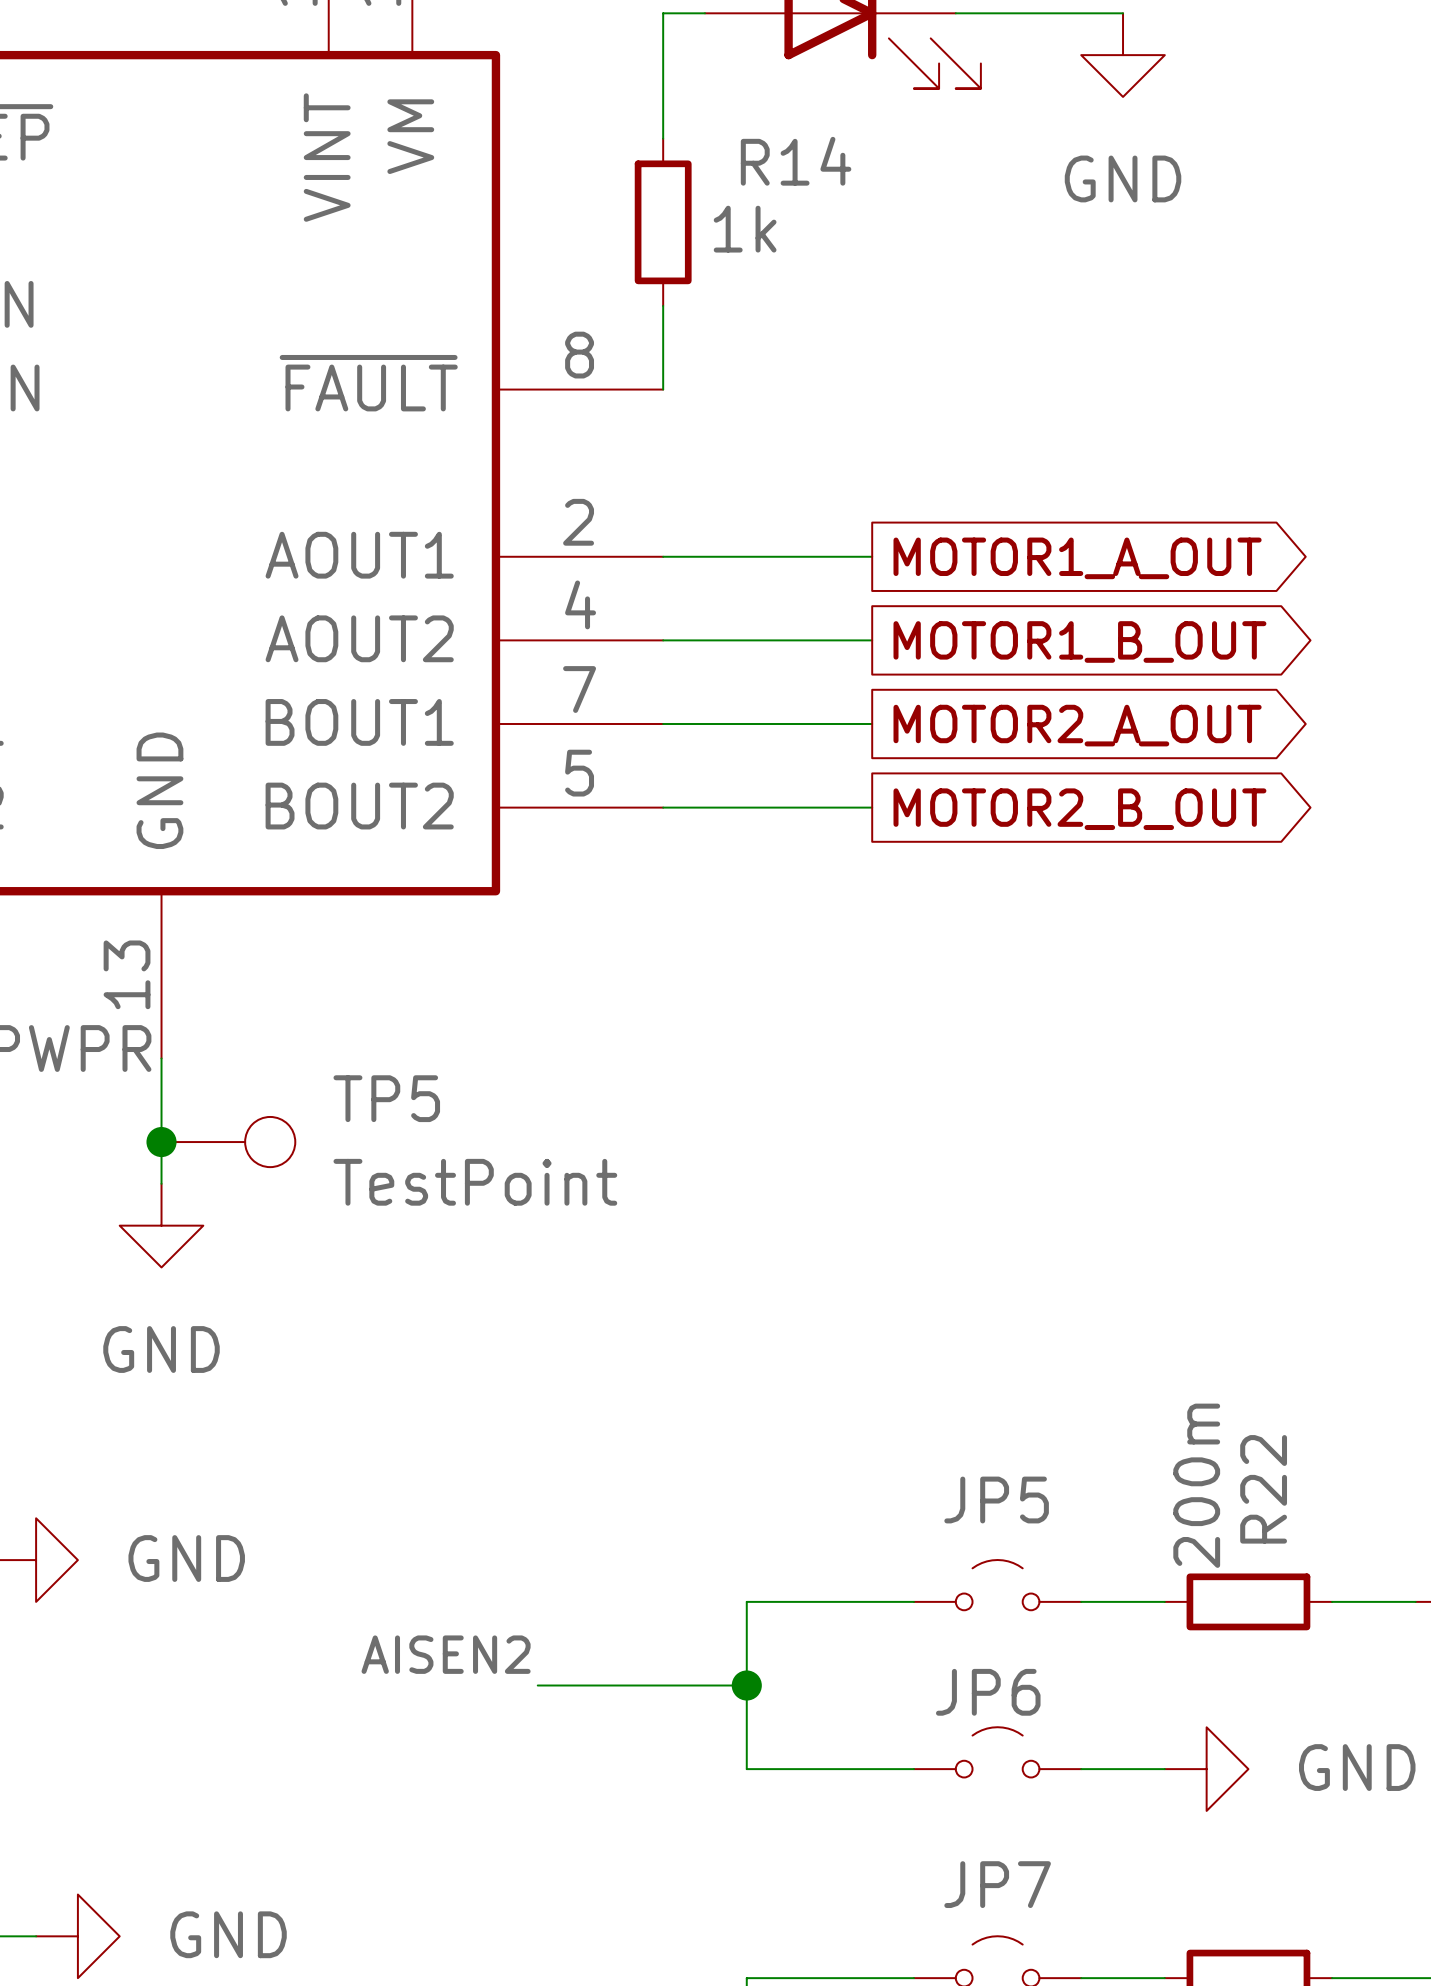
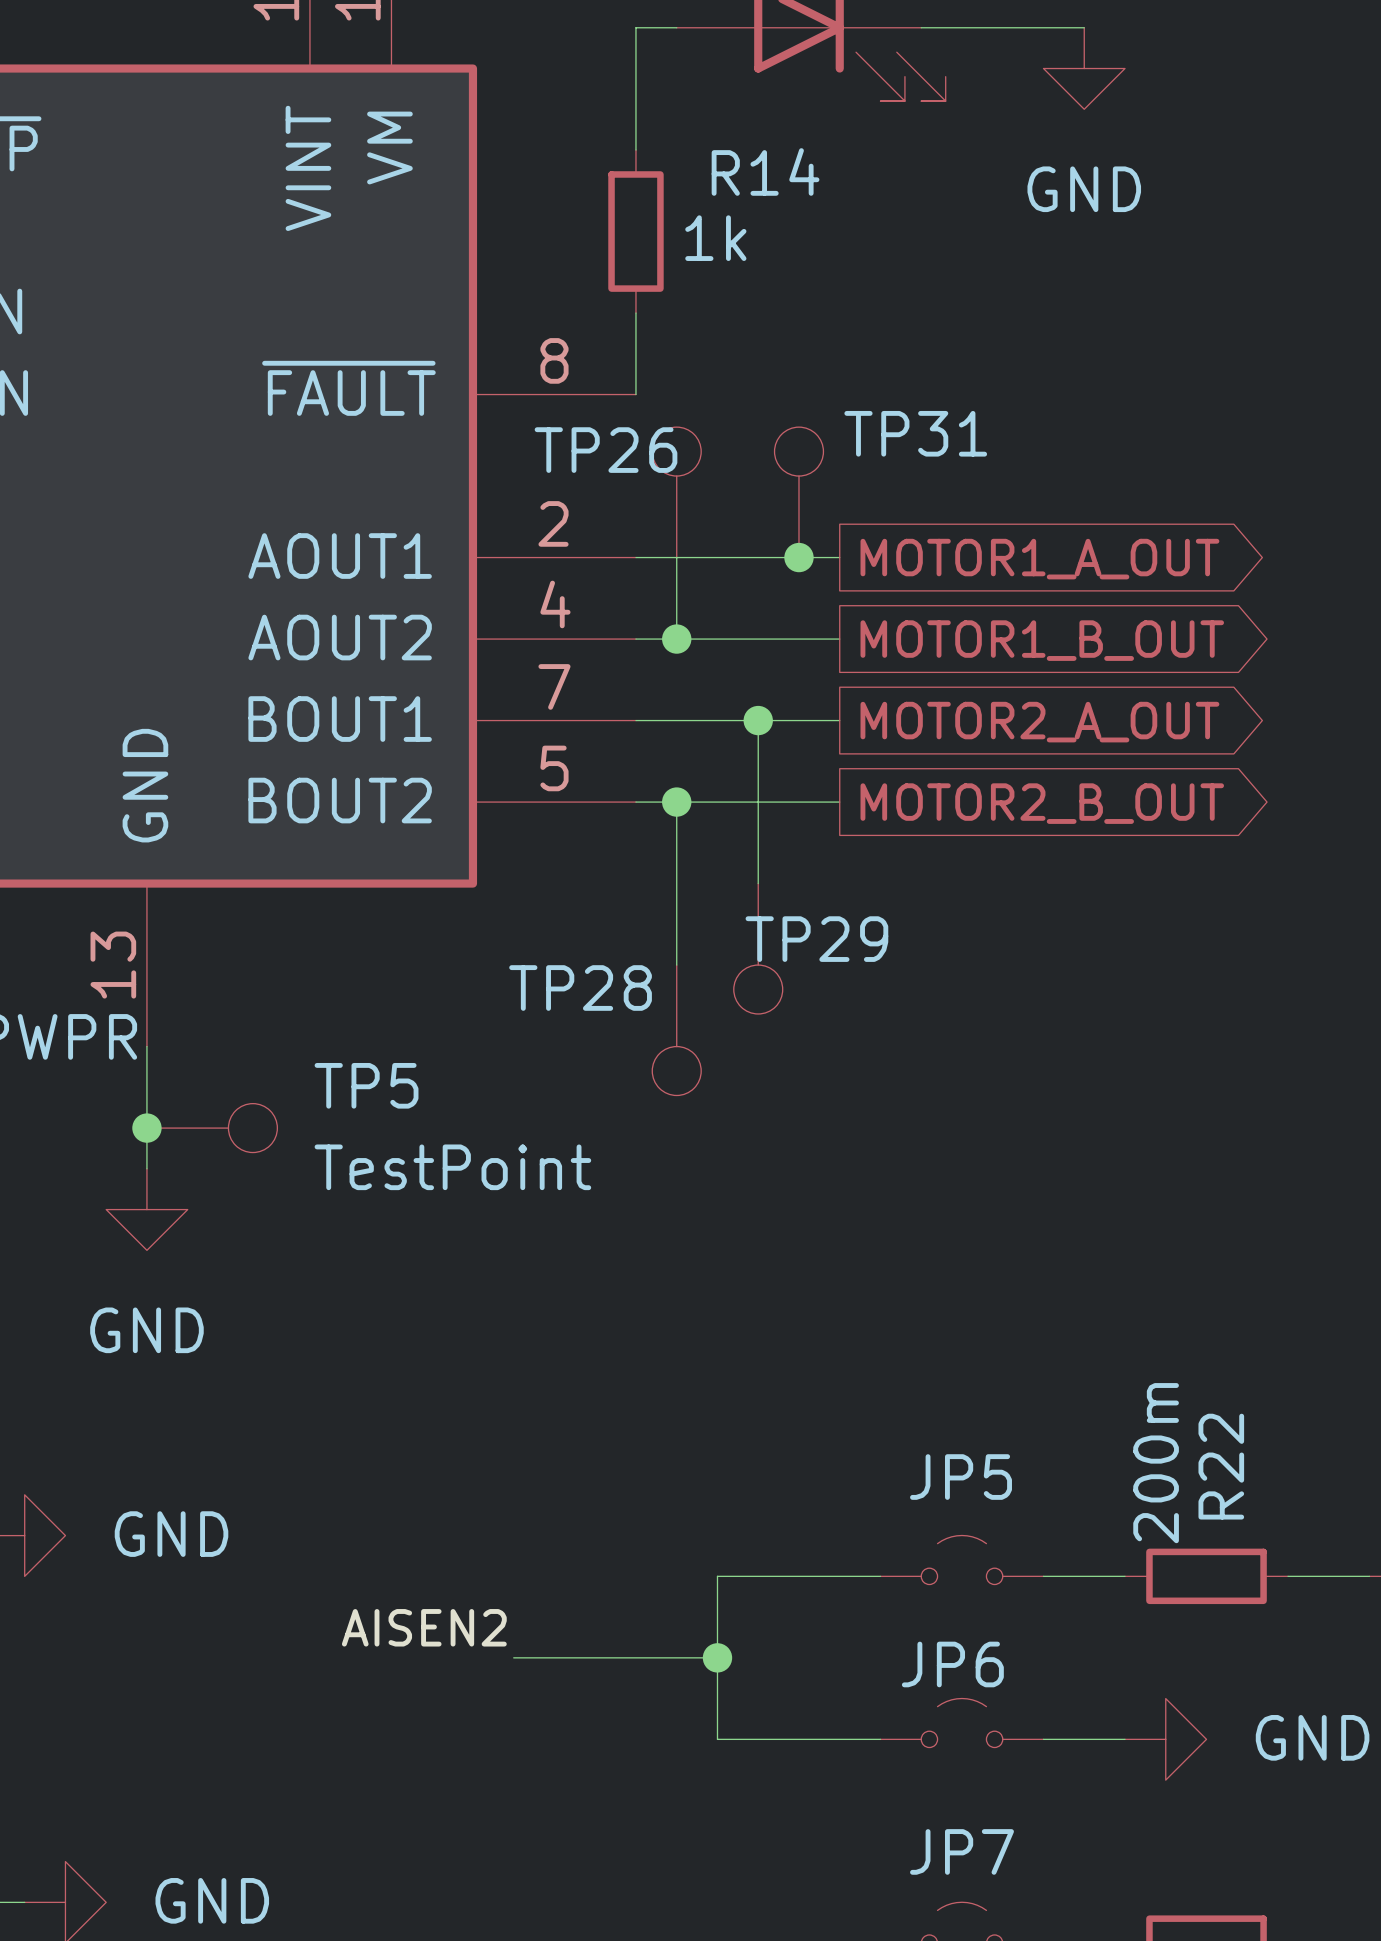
TP26: none -> (676, 492)
TP31: none -> (798, 492)
wire: none -> (676, 557) (676, 639)
junction: none -> (798, 557)
junction: none -> (676, 639)
wire: none -> (758, 720) (758, 883)
junction: none -> (758, 720)
wire: none -> (676, 802) (676, 965)
junction: none -> (676, 802)
TP29: none -> (758, 948)
TP28: none -> (676, 1030)

